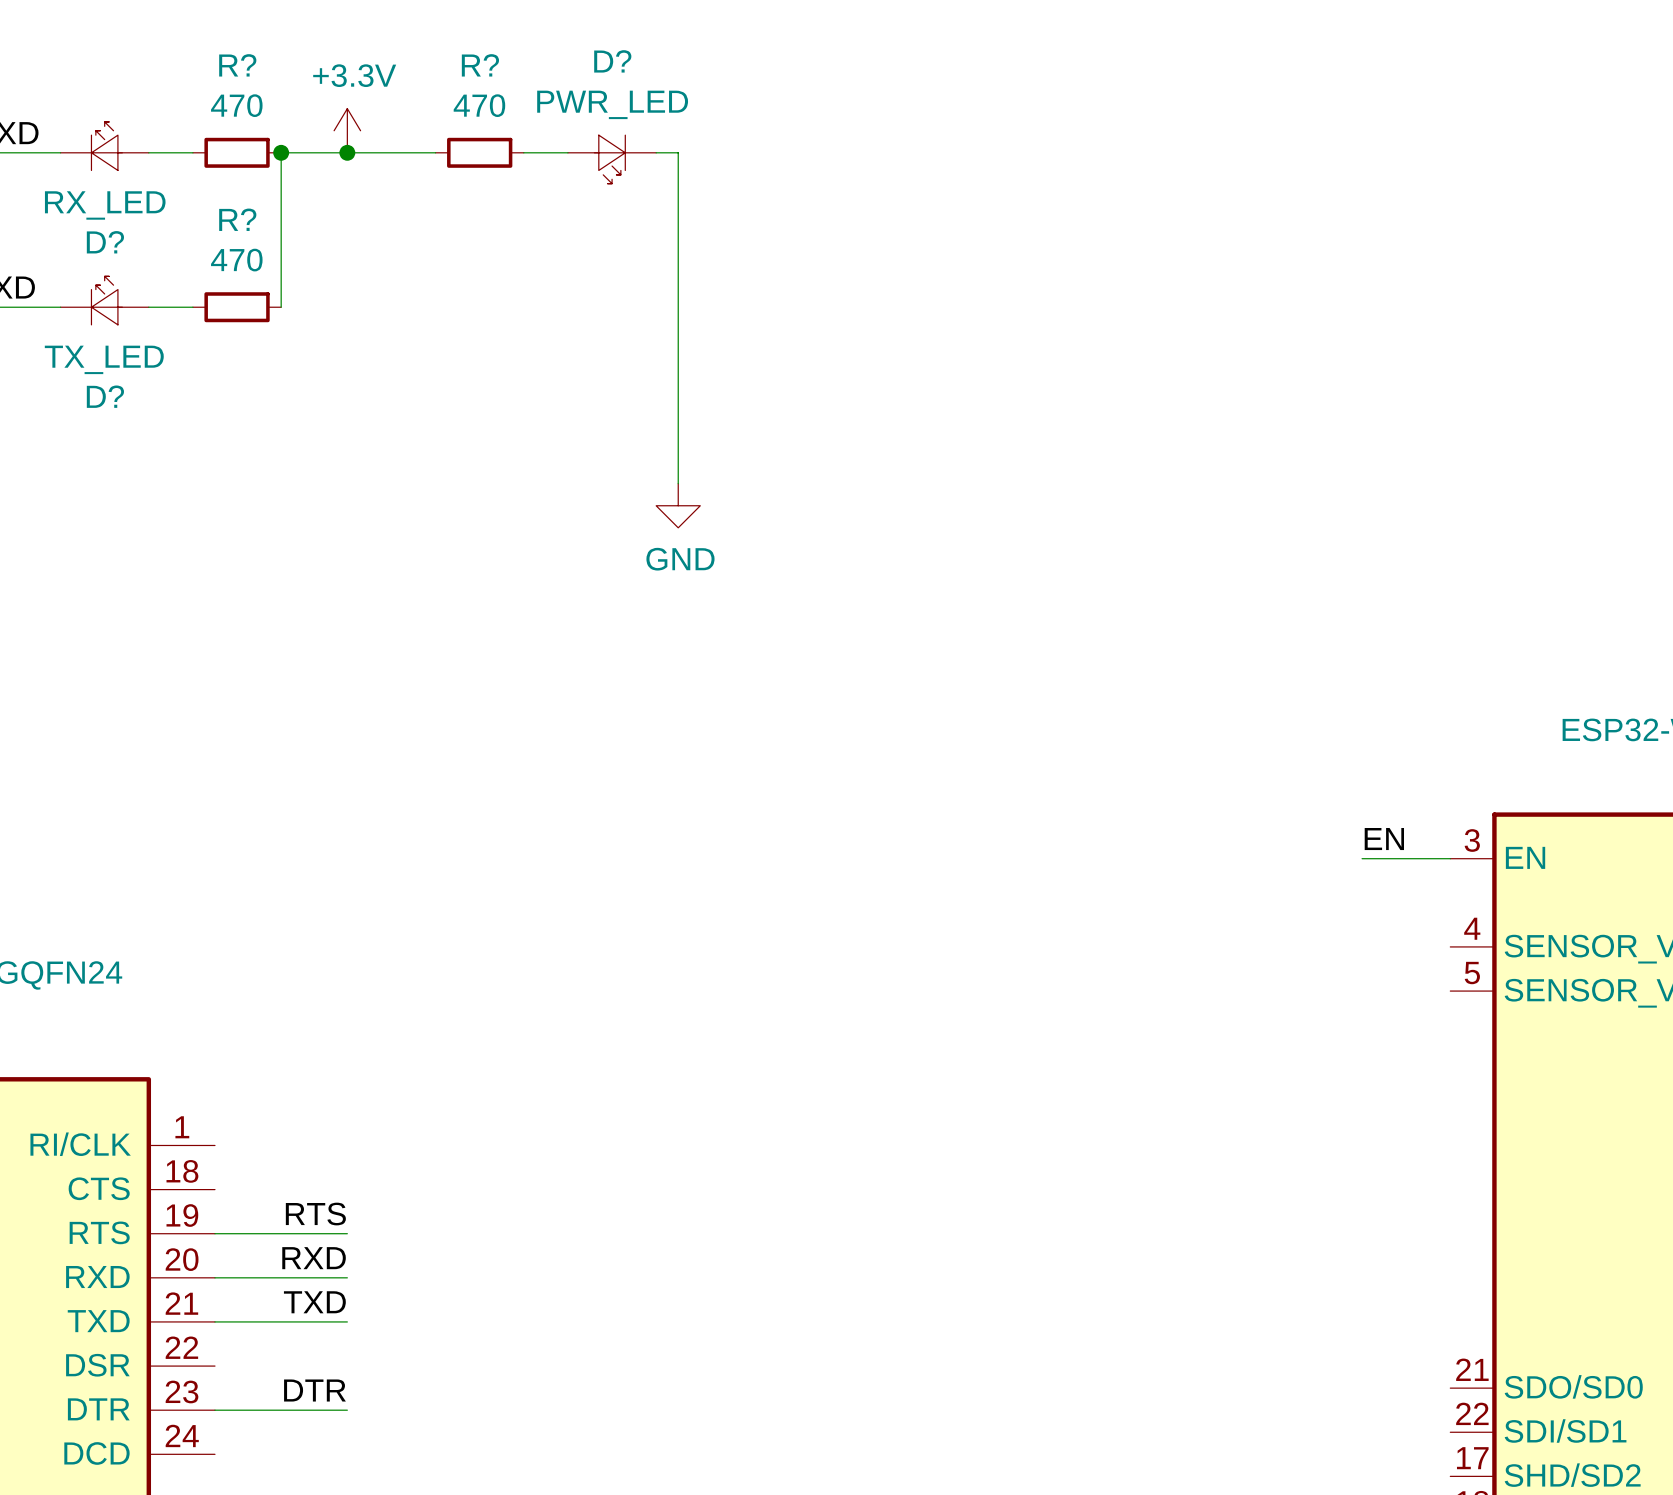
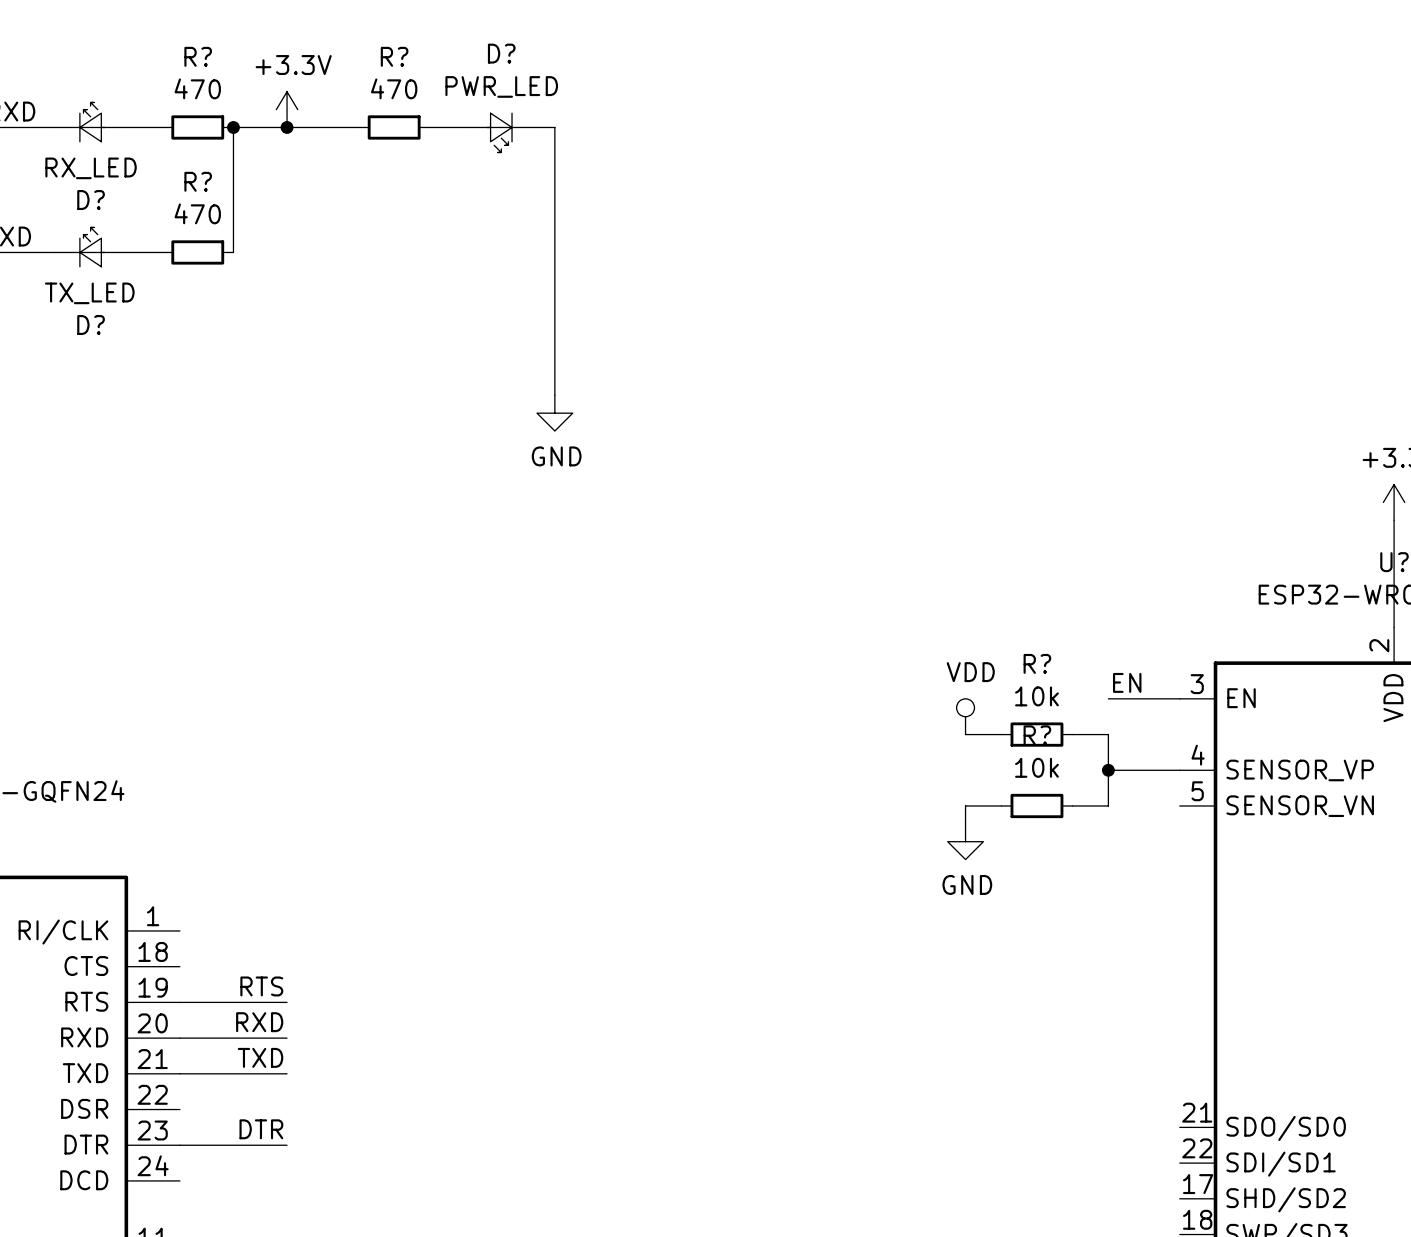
power symbol: none -> VDD (965, 716)
wire: none -> (965, 734) (1001, 734)
R?: none -> 10k (1036, 734)
wire: none -> (1072, 734) (1108, 734) (1108, 805) (1072, 805)
wire: none -> (1108, 770) (1179, 770)
junction: none -> (1108, 770)
wire: none -> (1001, 805) (965, 805) (965, 823)
R?: none -> 10k (1036, 805)
power symbol: none -> GND (965, 841)

